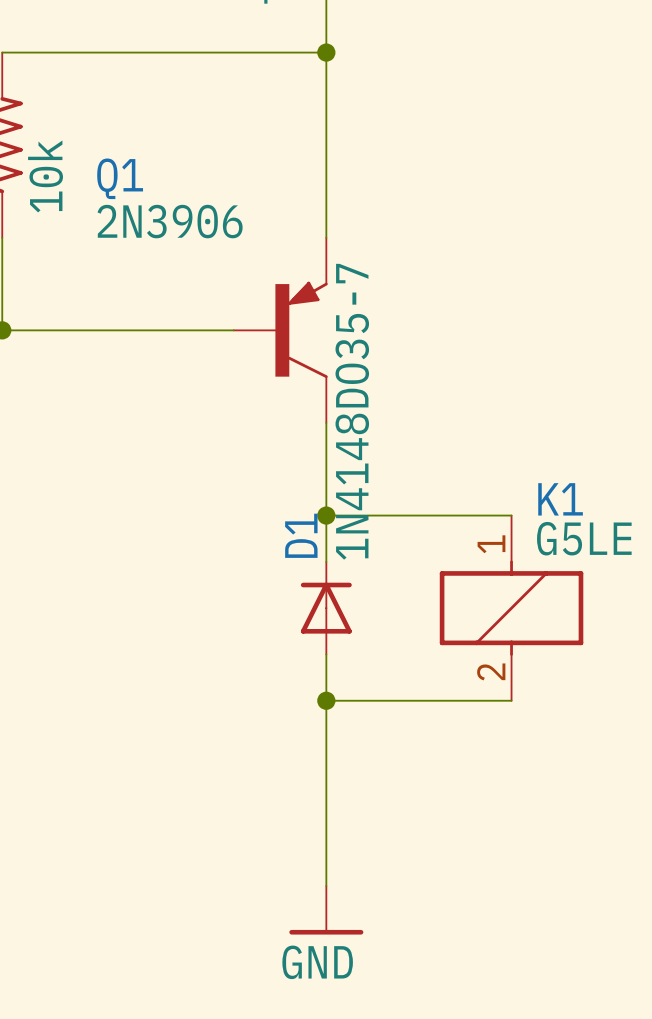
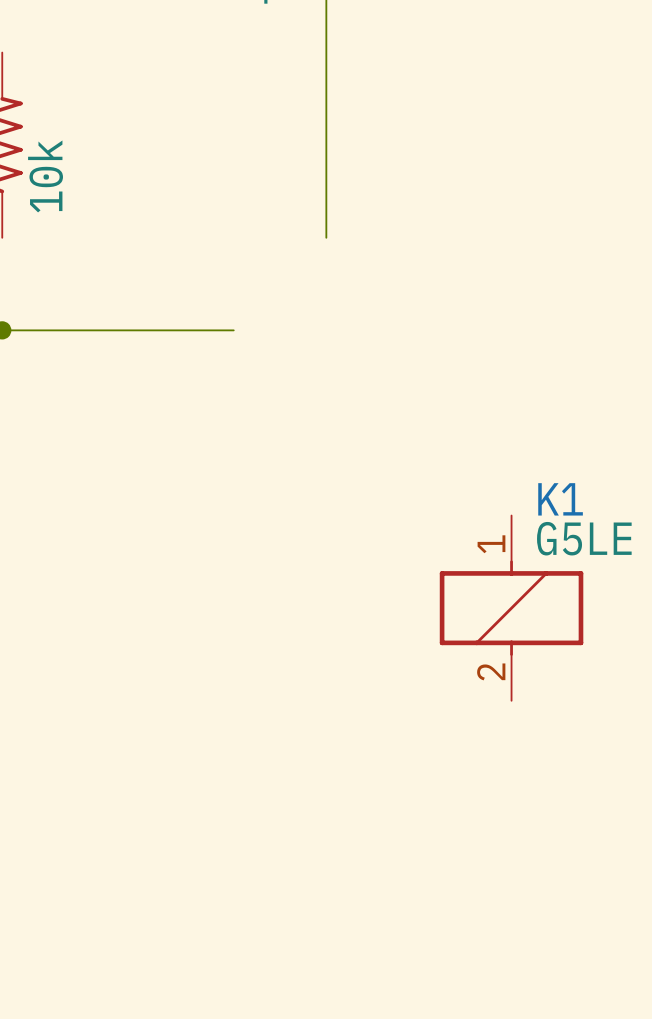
wire: (2, 52) (326, 52) -> none
junction: (326, 52) -> none
wire: (2, 237) (2, 330) -> none
Q1: 2N3906 (280, 330) -> none
wire: (326, 422) (326, 561) -> none
wire: (326, 515) (511, 515) -> none
junction: (326, 515) -> none
D1: 1N4148DO35-7 (326, 608) -> none
wire: (326, 654) (326, 885) -> none
wire: (326, 700) (511, 700) -> none
junction: (326, 700) -> none
power symbol: GND (326, 910) -> none

